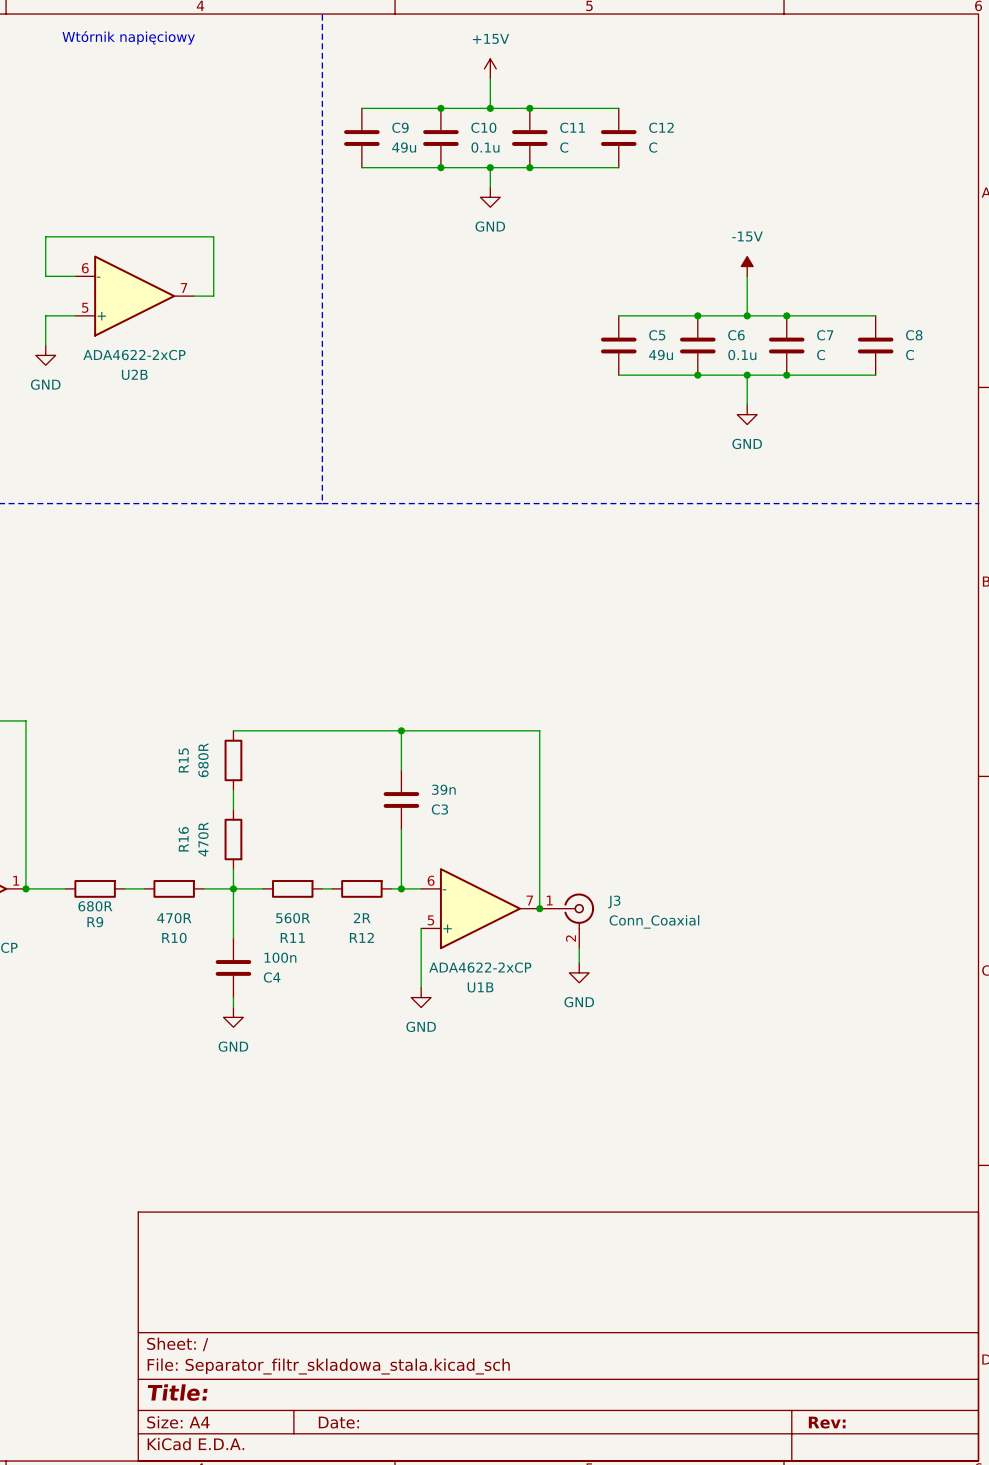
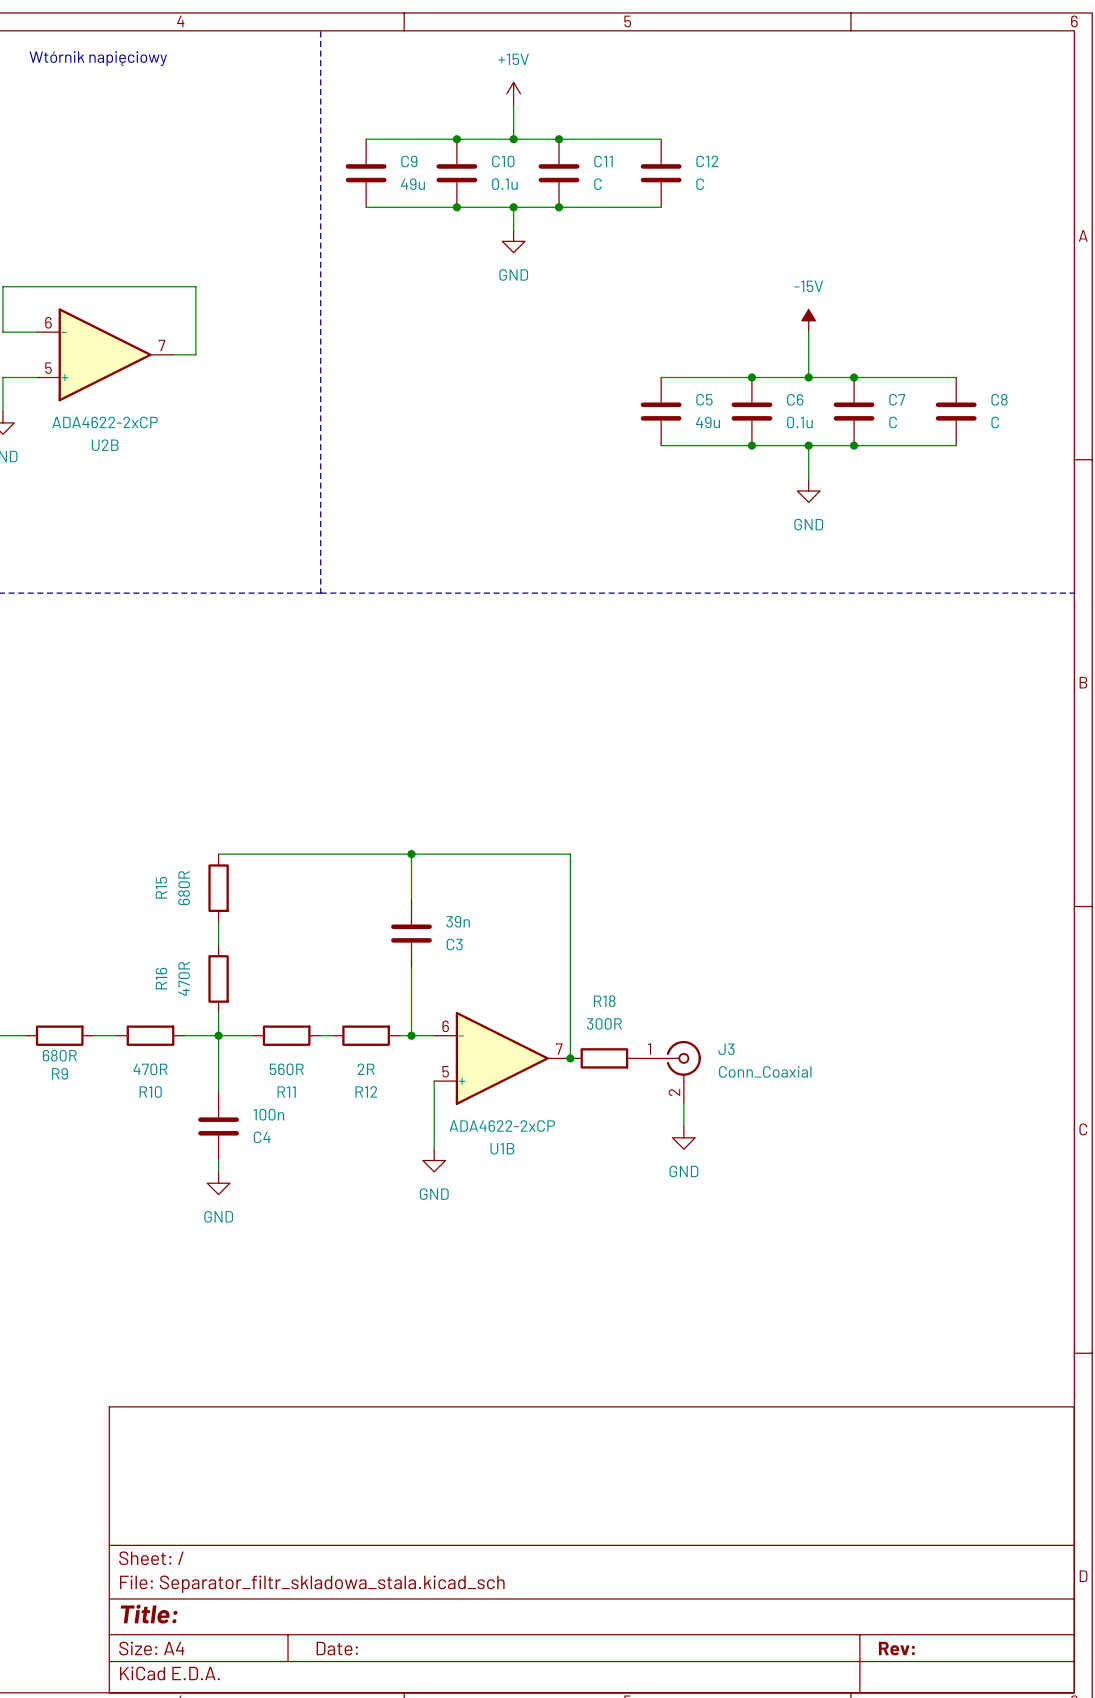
R18: none -> 300R (604, 1058)
J3 position: (566, 920) -> (669, 1072)
wire: (579, 948) (579, 963) -> none
wire: none -> (683, 1103) (683, 1126)
power symbol position: GND (579, 972) -> GND (683, 1137)

